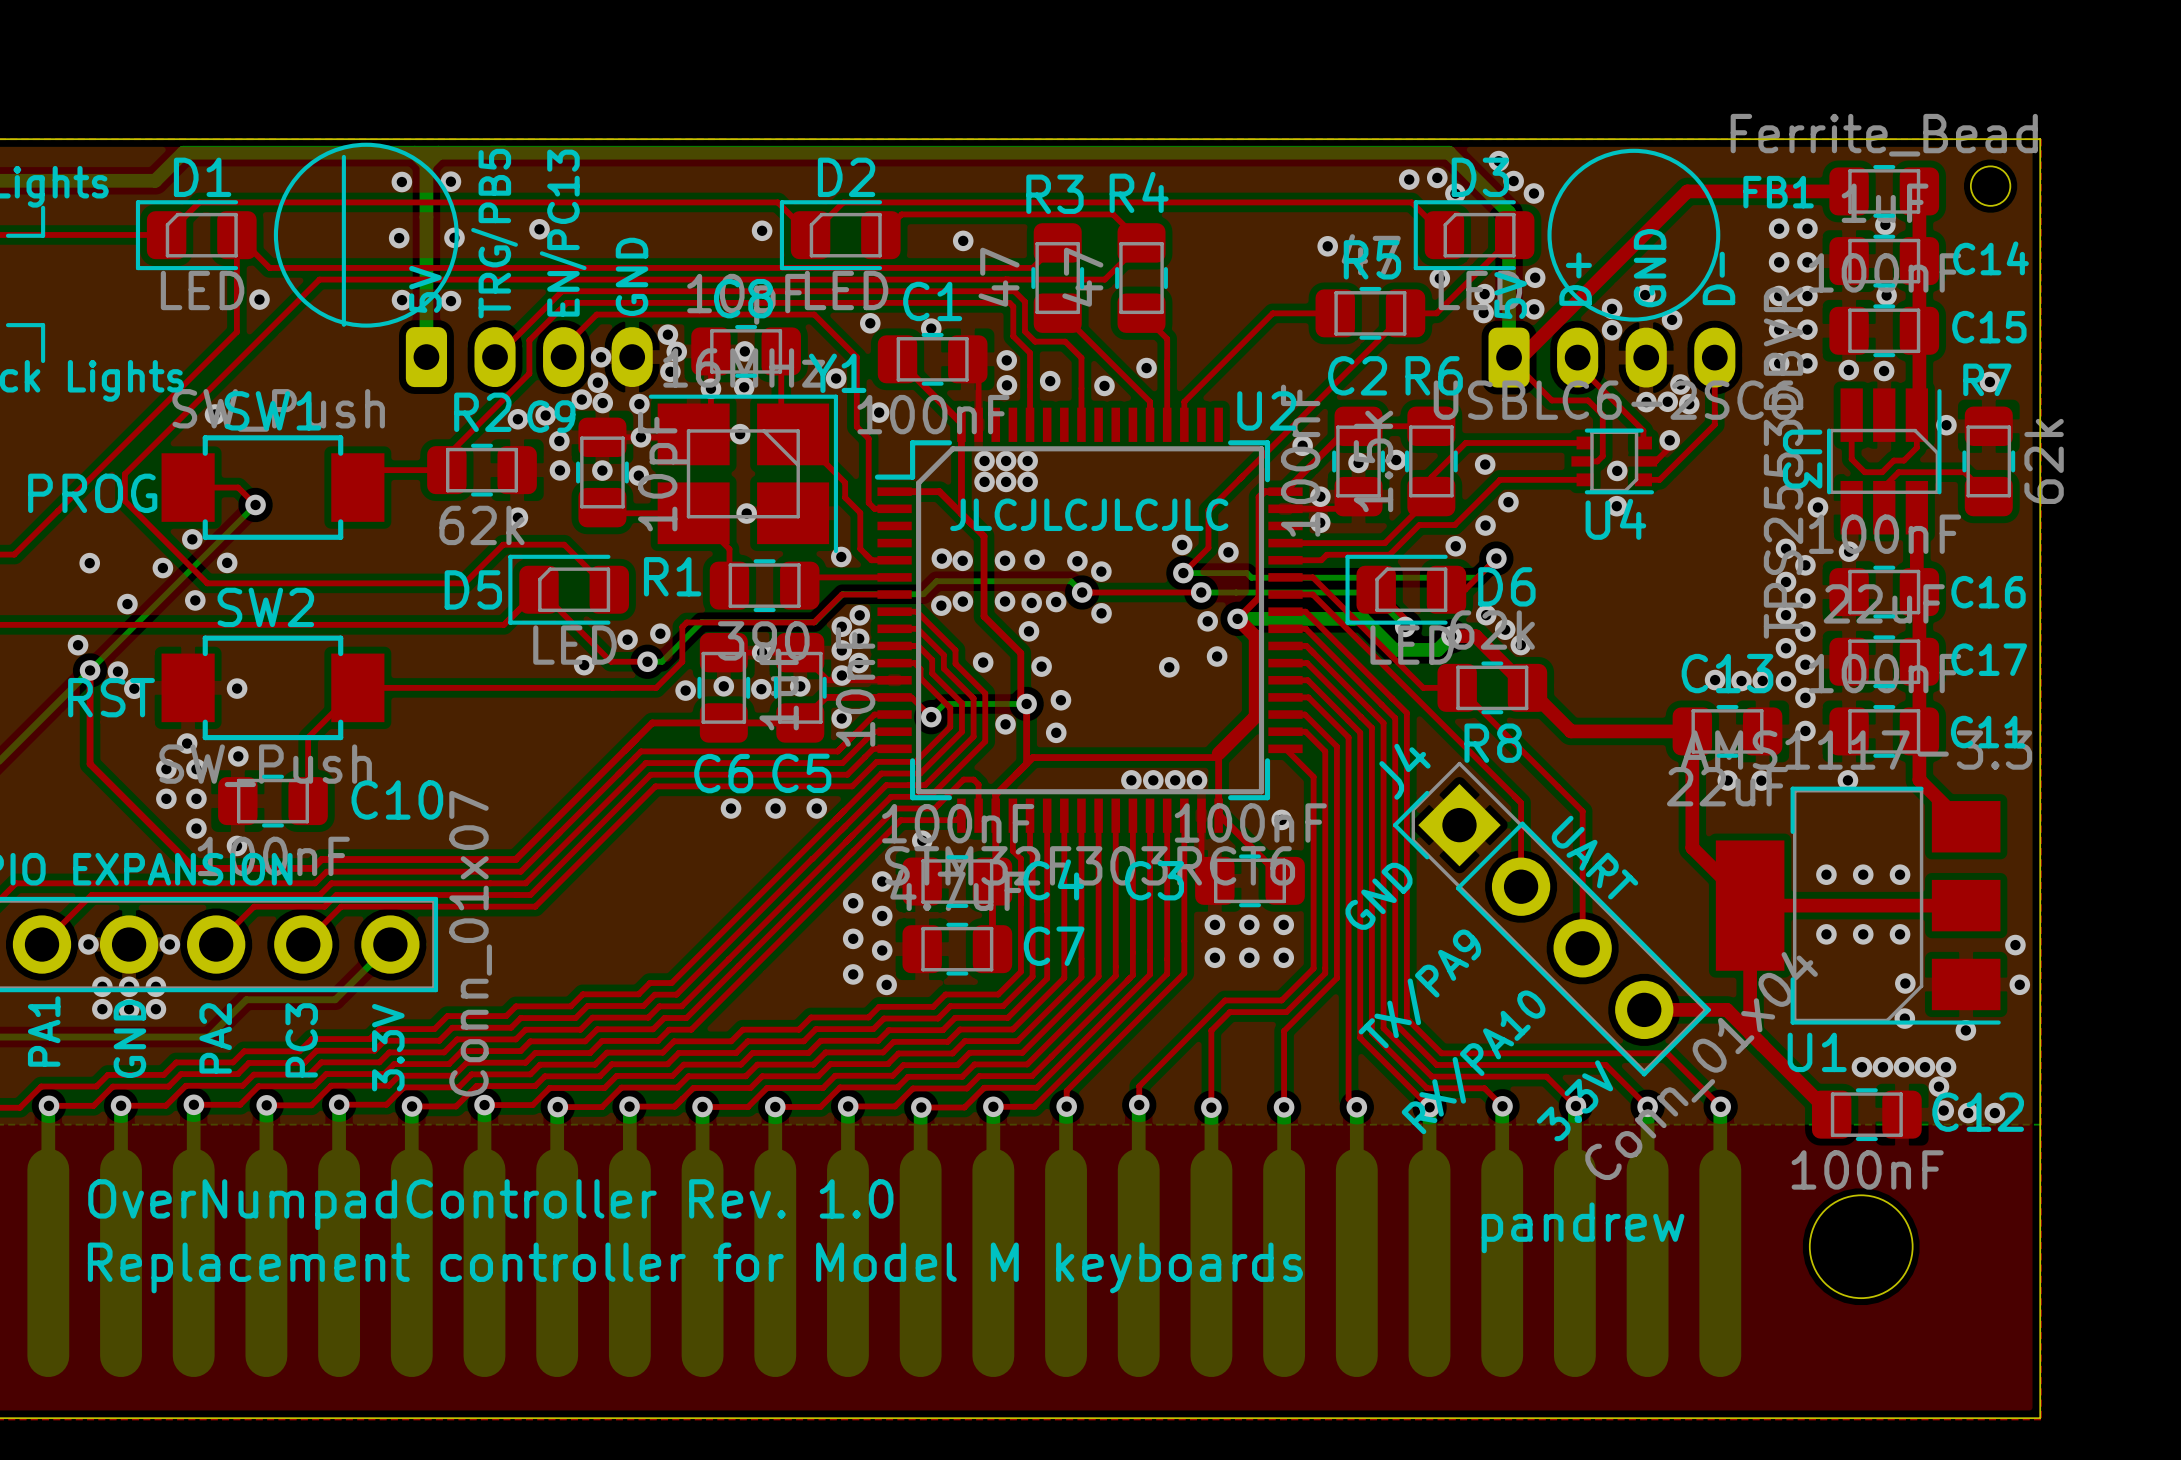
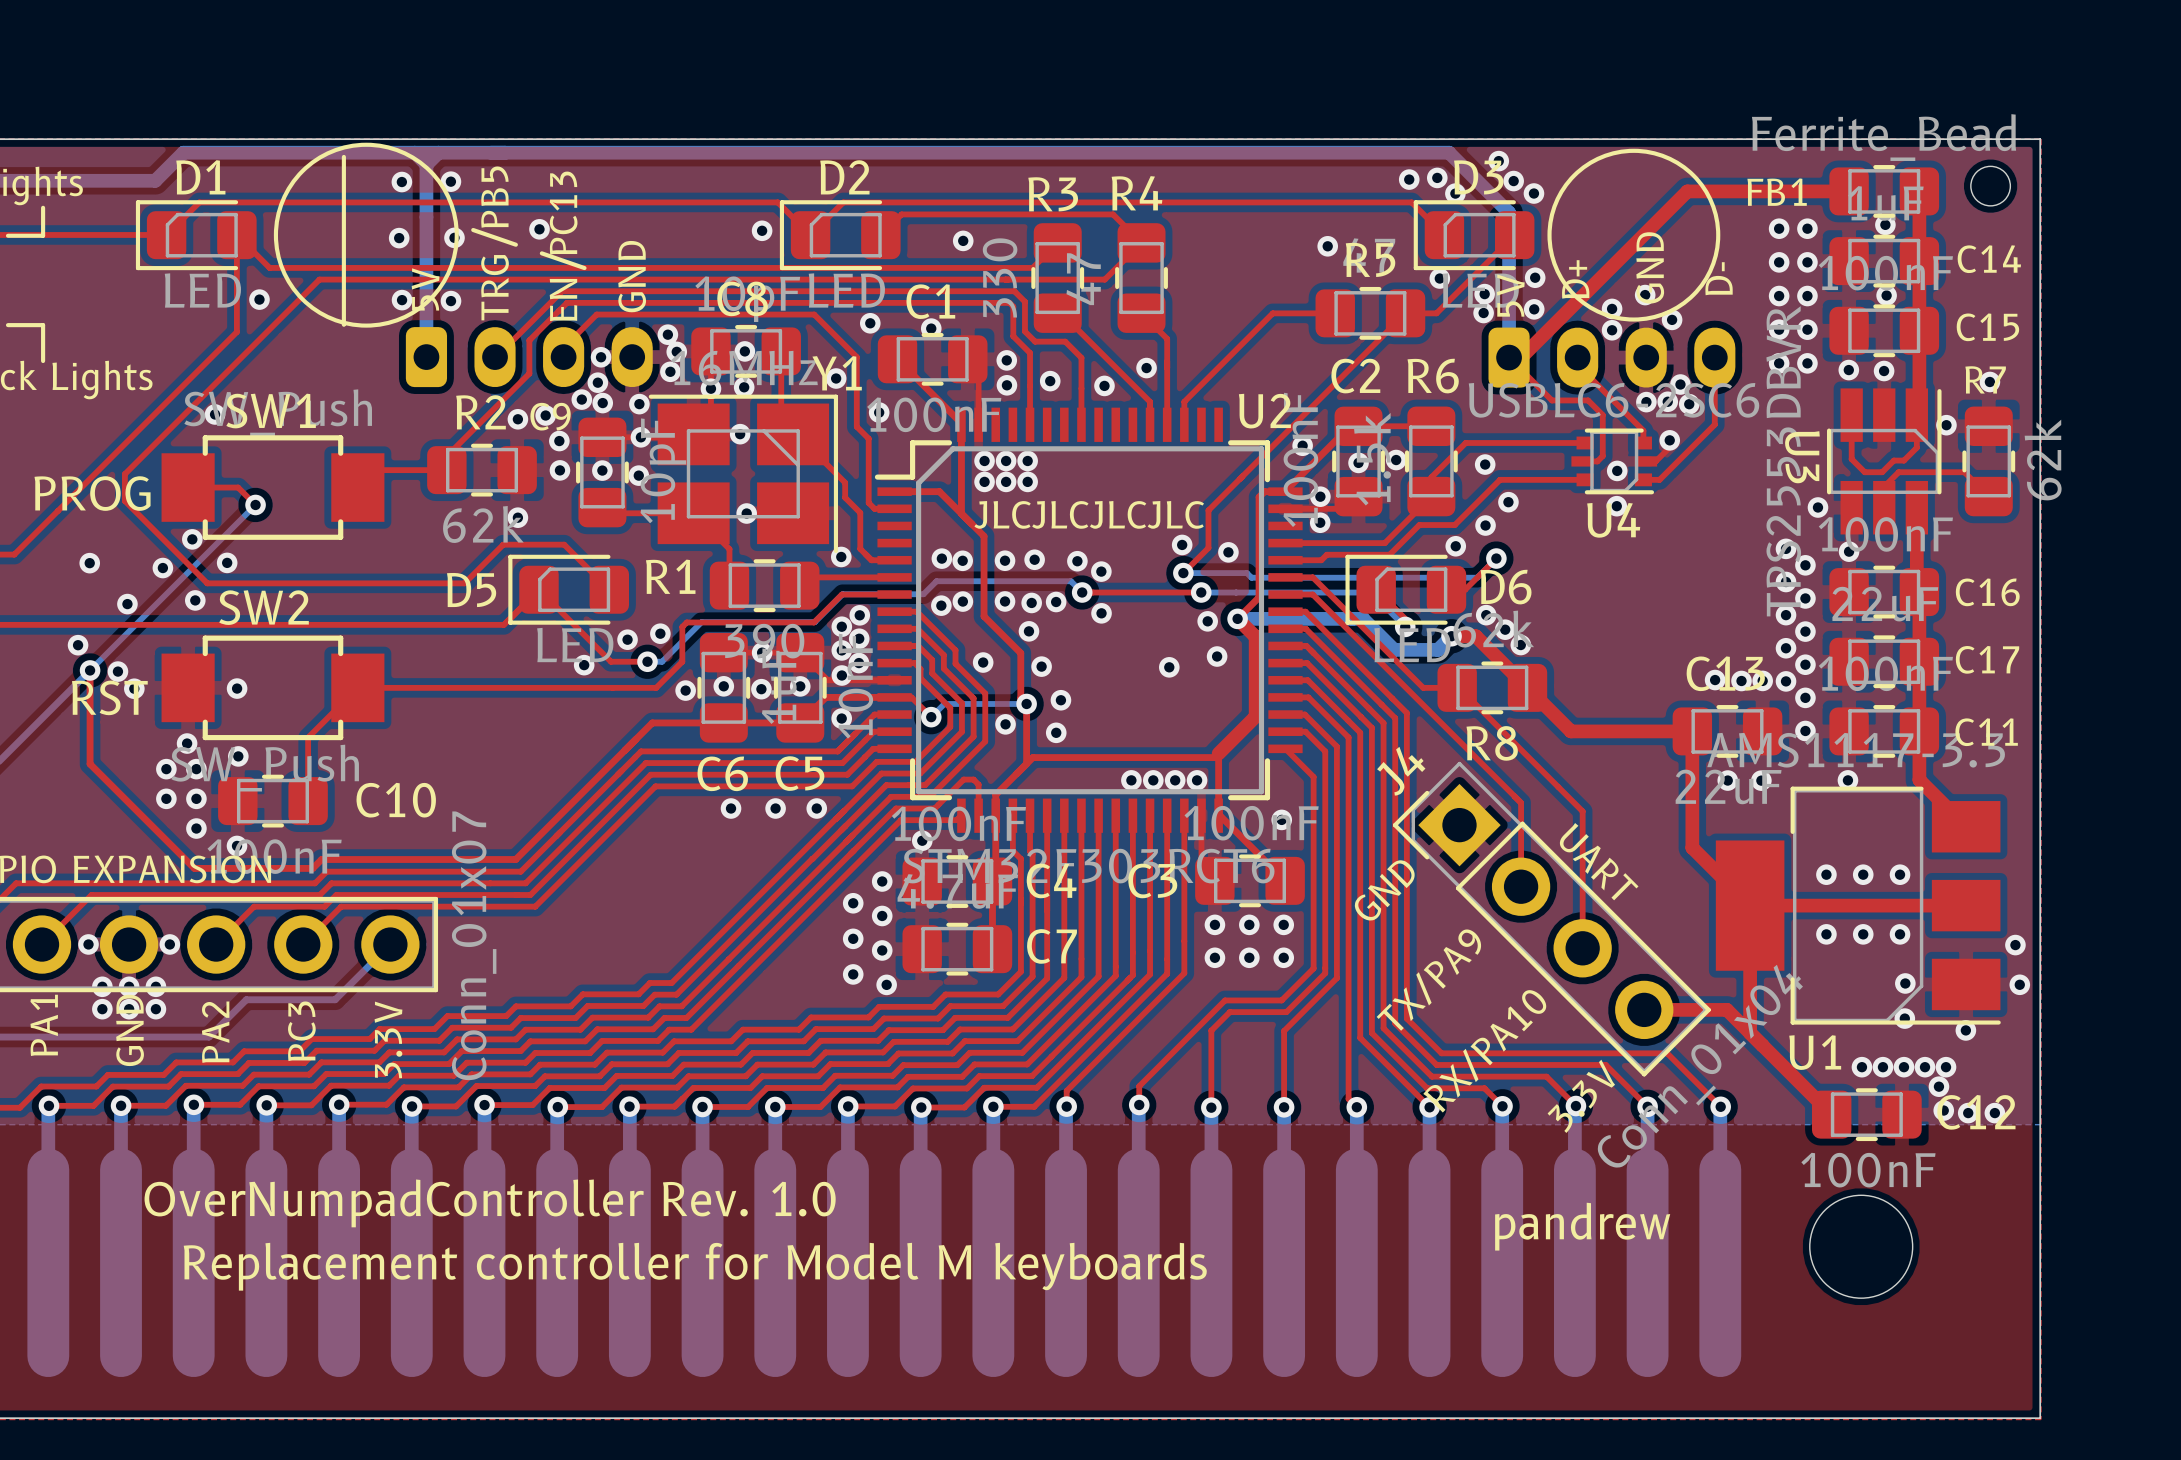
R3 value: 47 (999, 277) -> 330 (1000, 277)

